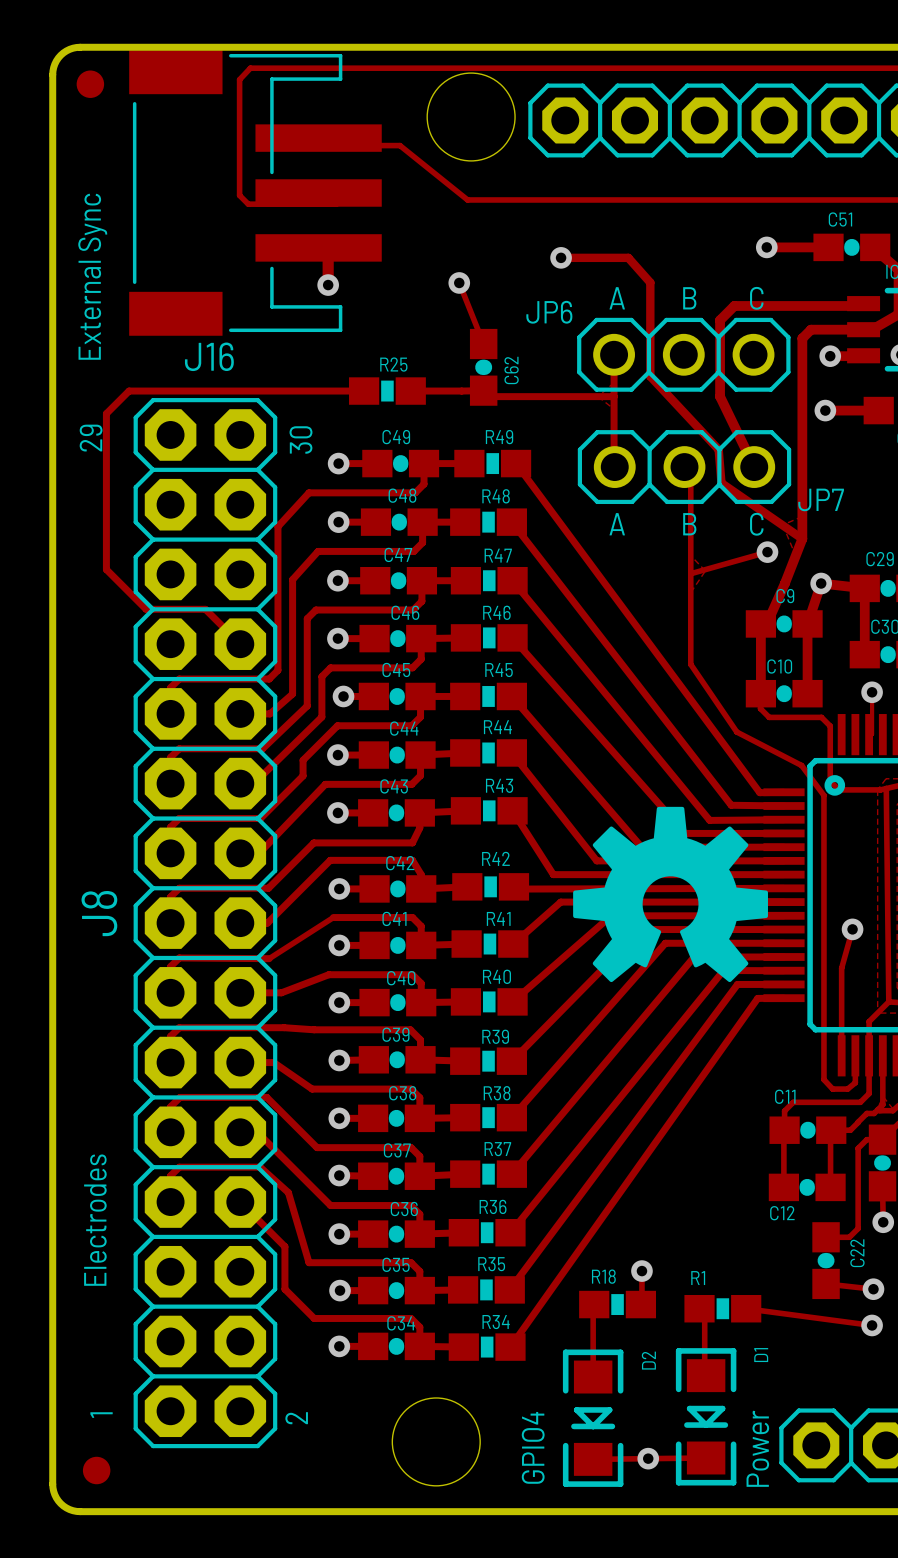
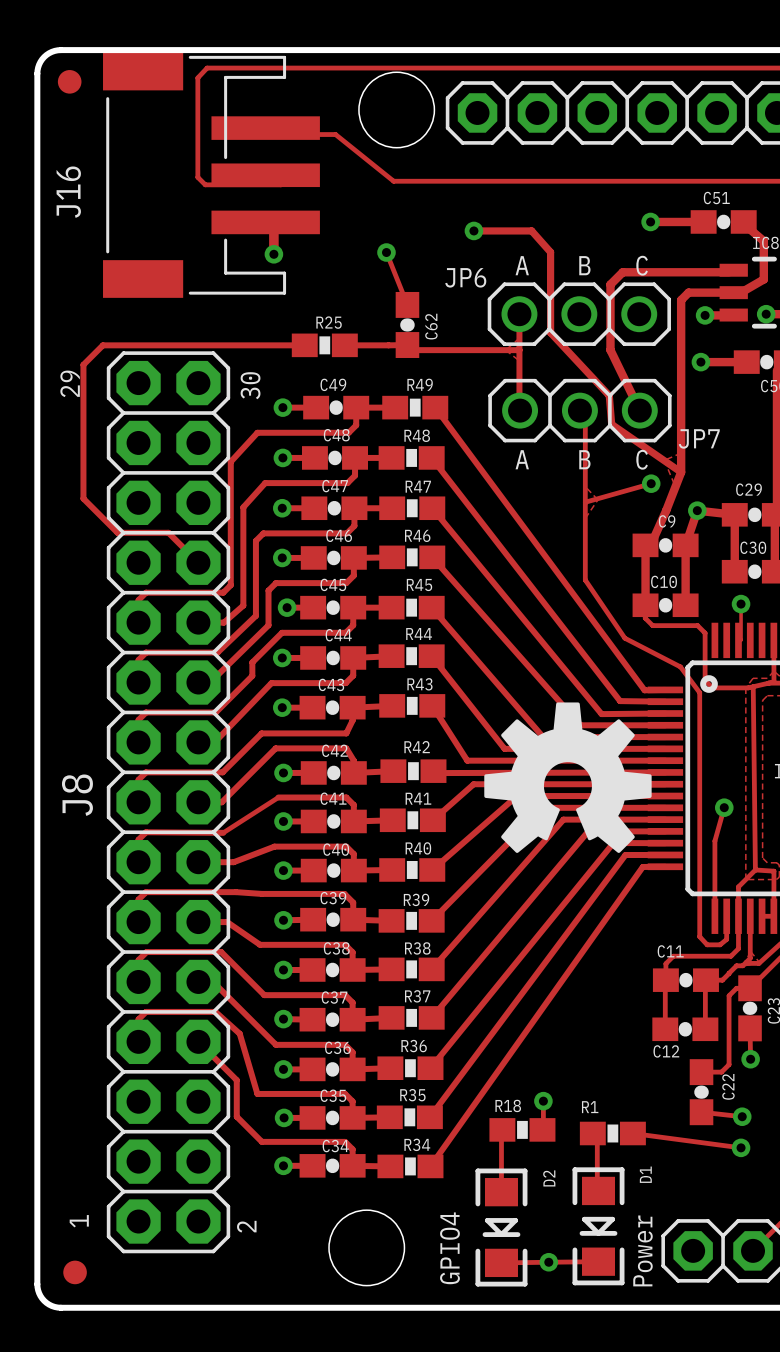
text: External Sync (92, 276) -> none
J16 name rotation: 0° (209, 356) -> 90° counterclockwise (68, 192)
J16 name position: J16 (209, 356) -> J16 (68, 192)
text: Electrodes (95, 1220) -> none

